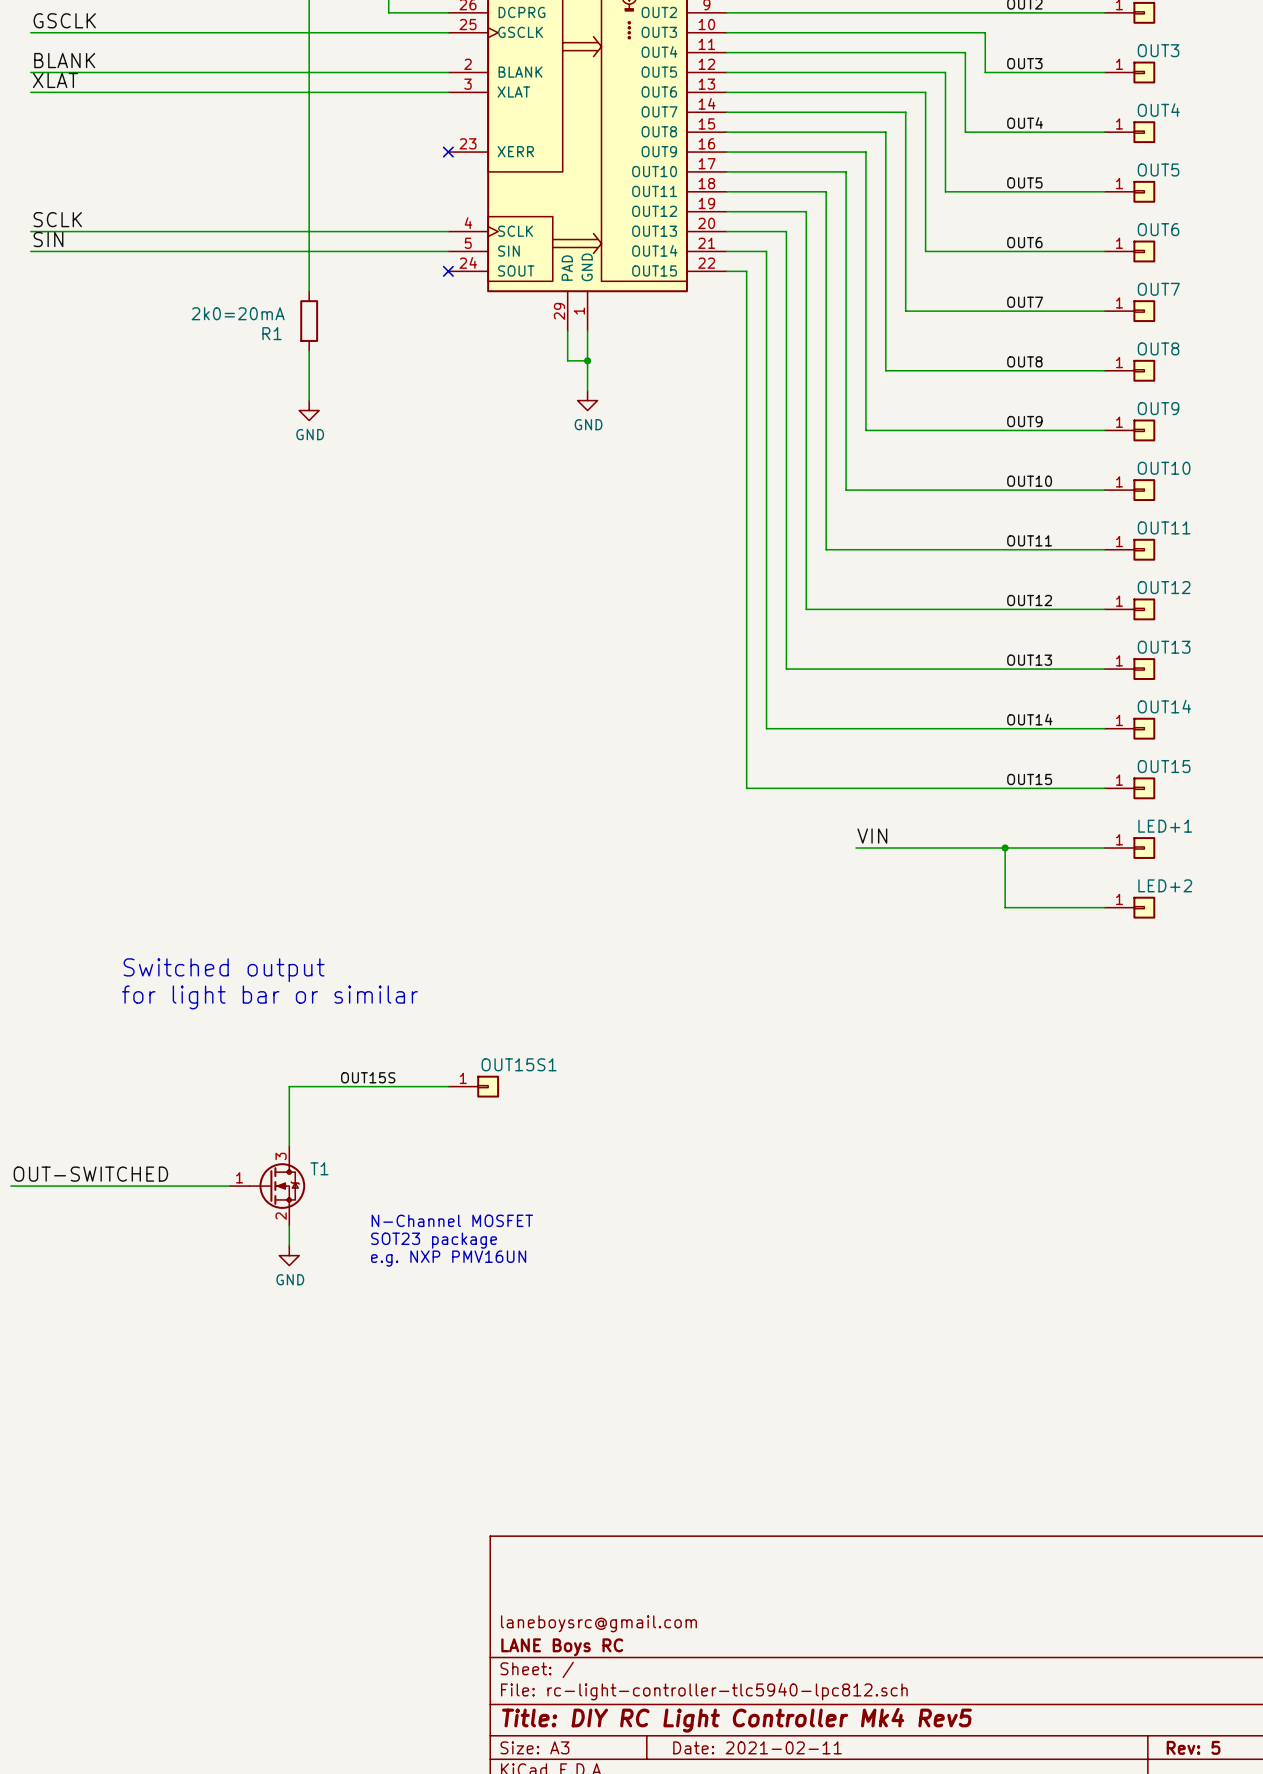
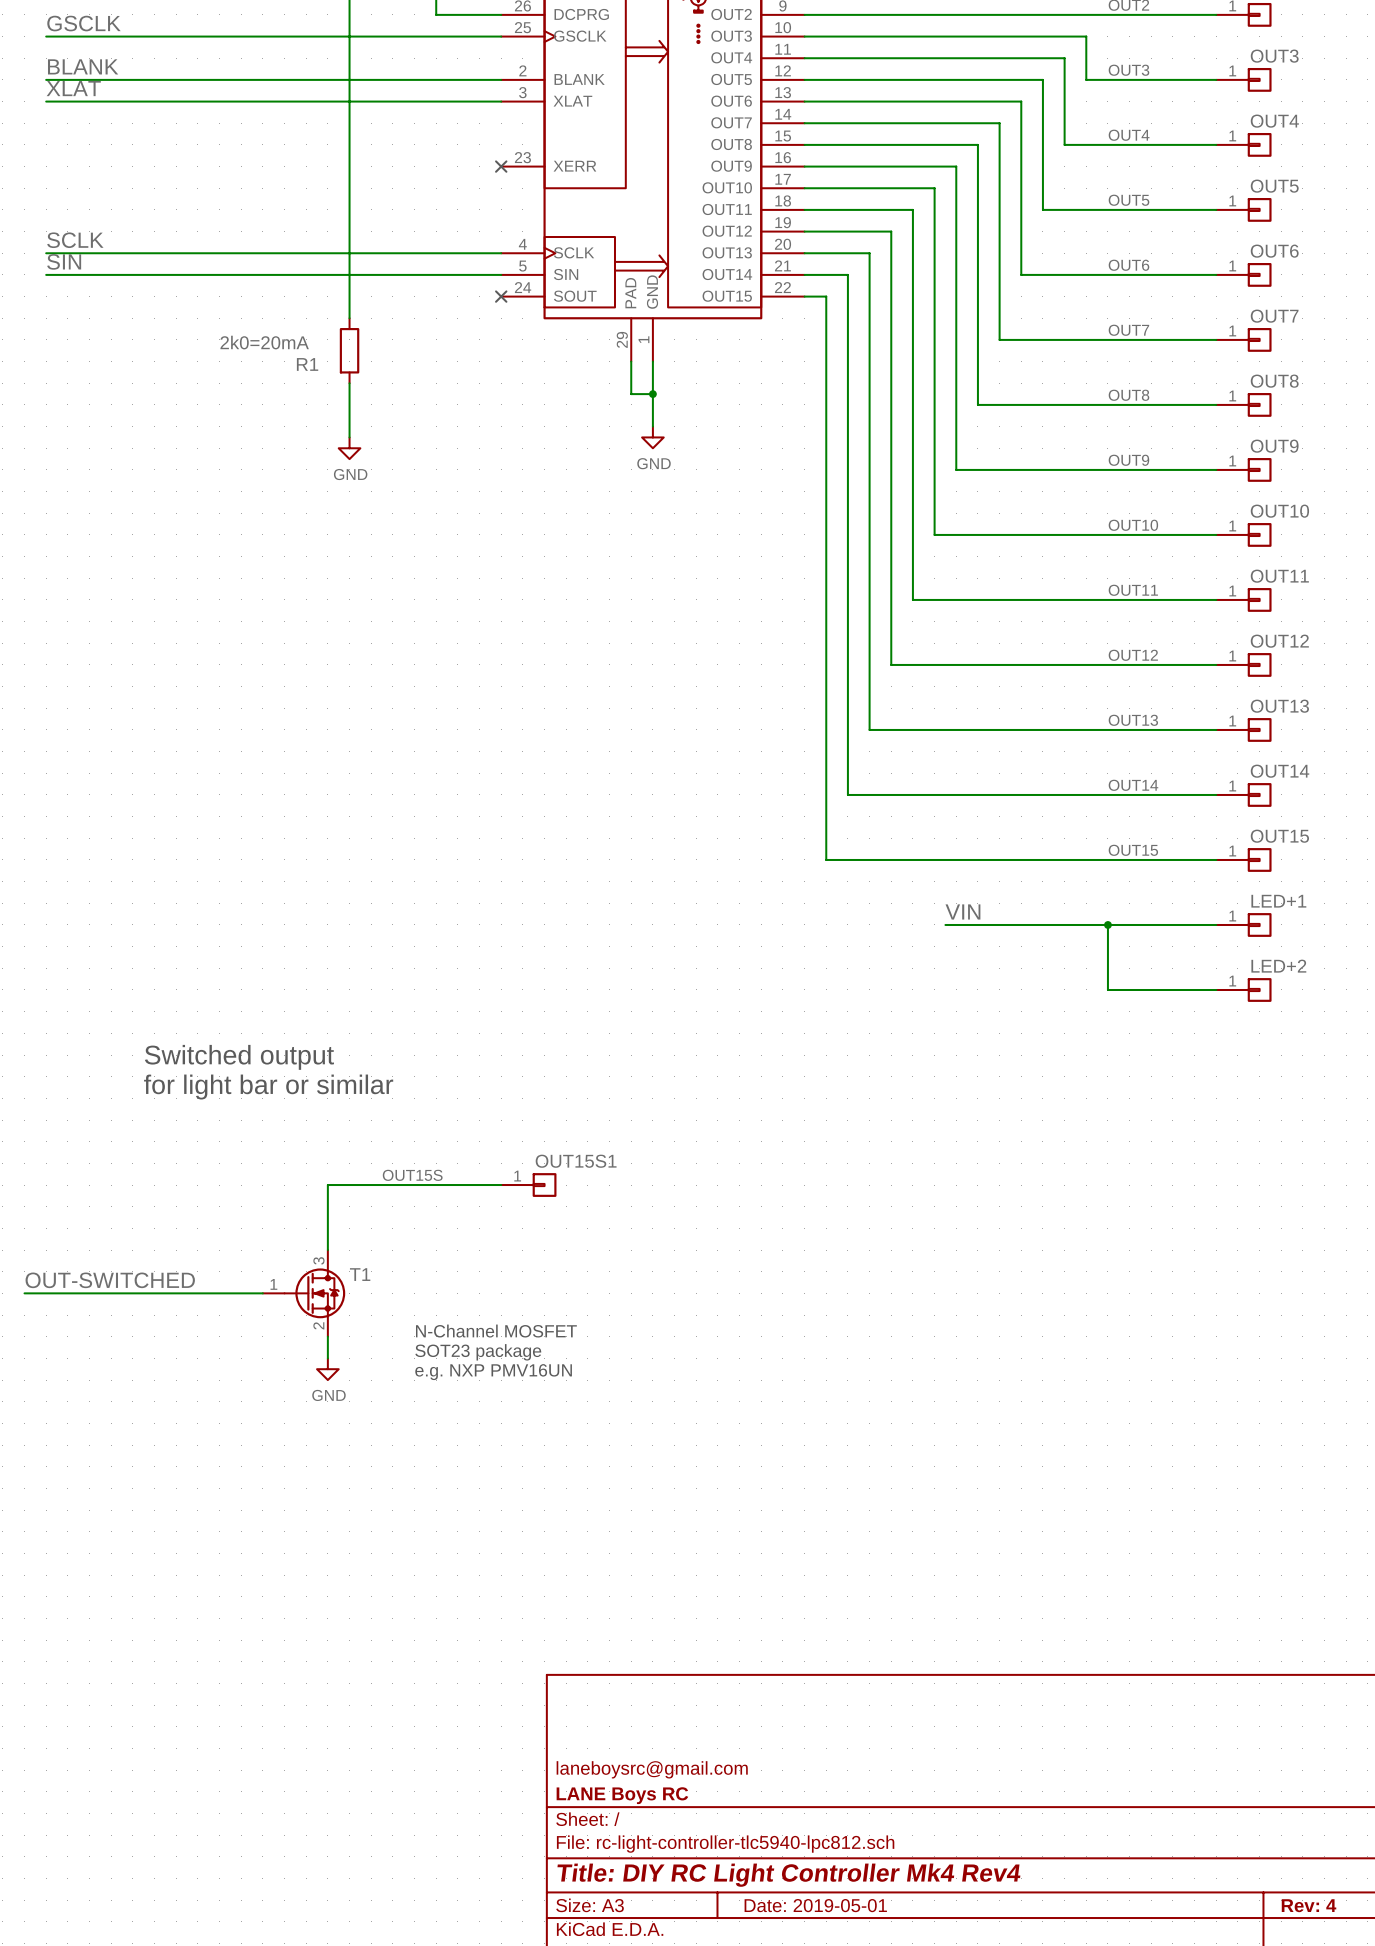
title block: Title: DIY RC Light Controller Mk4 Rev5 (736, 1720) -> Title: DIY RC Light Controller Mk4 Rev4 (788, 1875)
title block: Date: 2021-02-11 (757, 1747) -> Date: 2019-05-01 (815, 1905)
title block: Rev: 5 (1193, 1747) -> Rev: 4 (1309, 1905)

